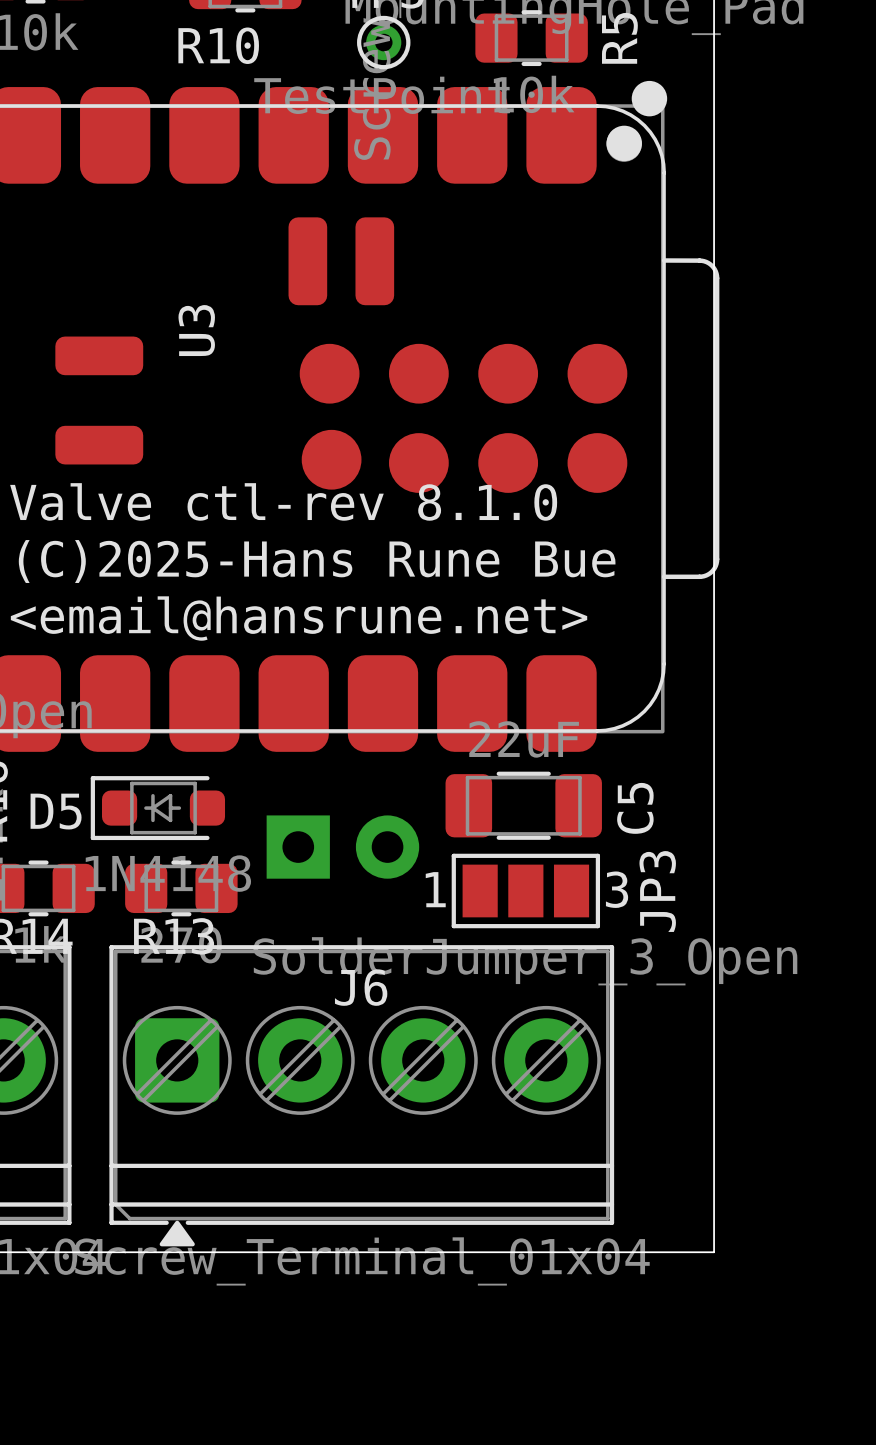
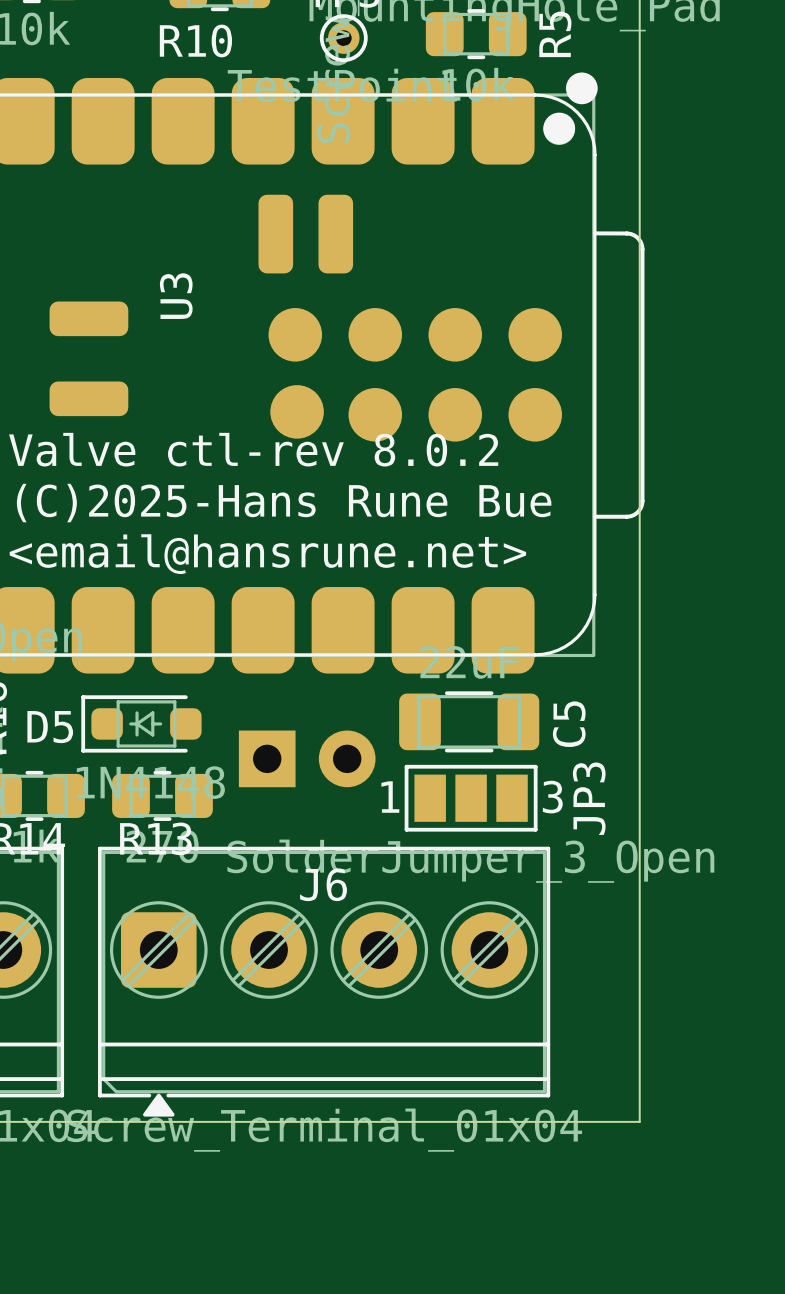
text: Valve ctl-rev 8.1.0 (283, 501) -> Valve ctl-rev 8.0.2 (253, 449)

